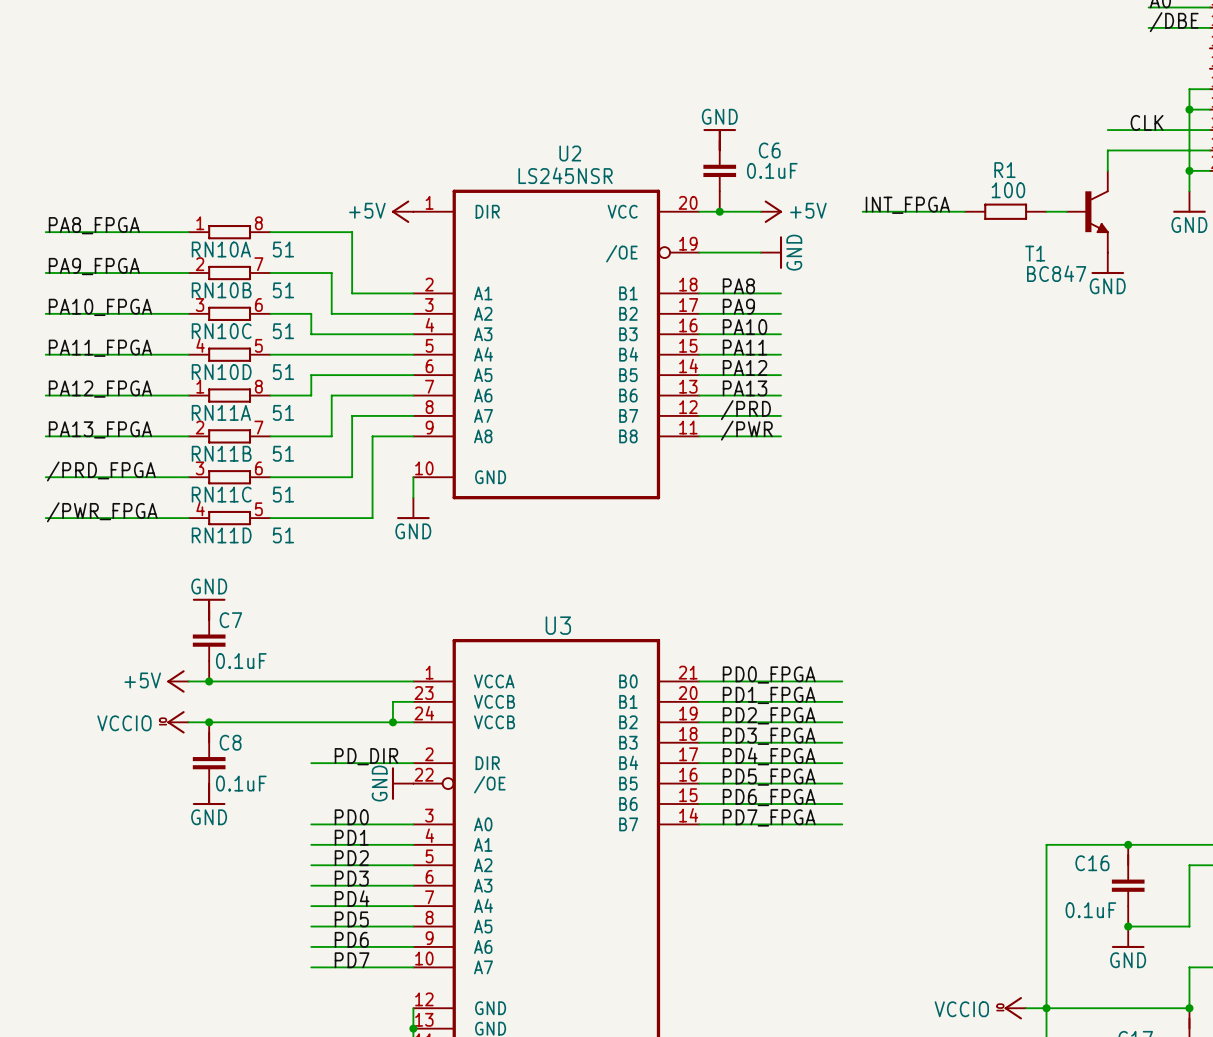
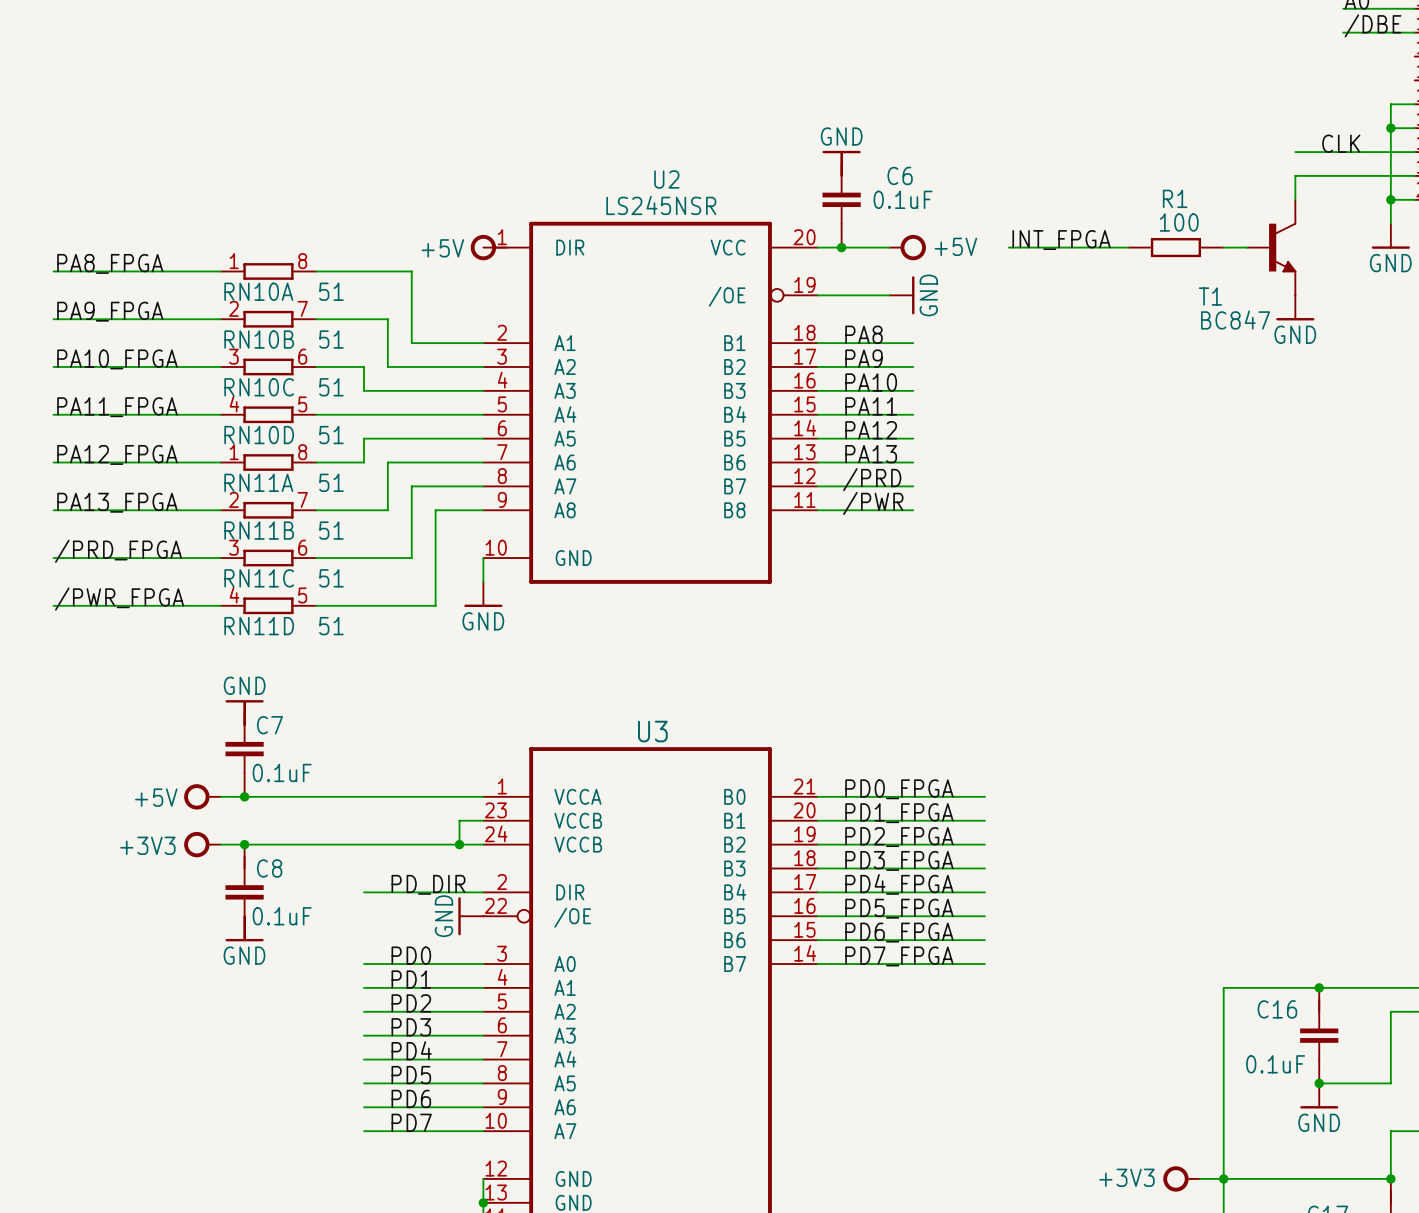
power symbol shape: [760, 200, 783, 223] -> [888, 234, 926, 261]
power symbol: +5V (402, 211) -> none
power symbol: none -> +5V (489, 247)
power symbol shape: [167, 670, 189, 693] -> [184, 784, 222, 810]
power symbol: VCCIO (178, 722) -> +3V3 (202, 844)
power symbol: VCCIO (1015, 1008) -> +3V3 (1181, 1178)

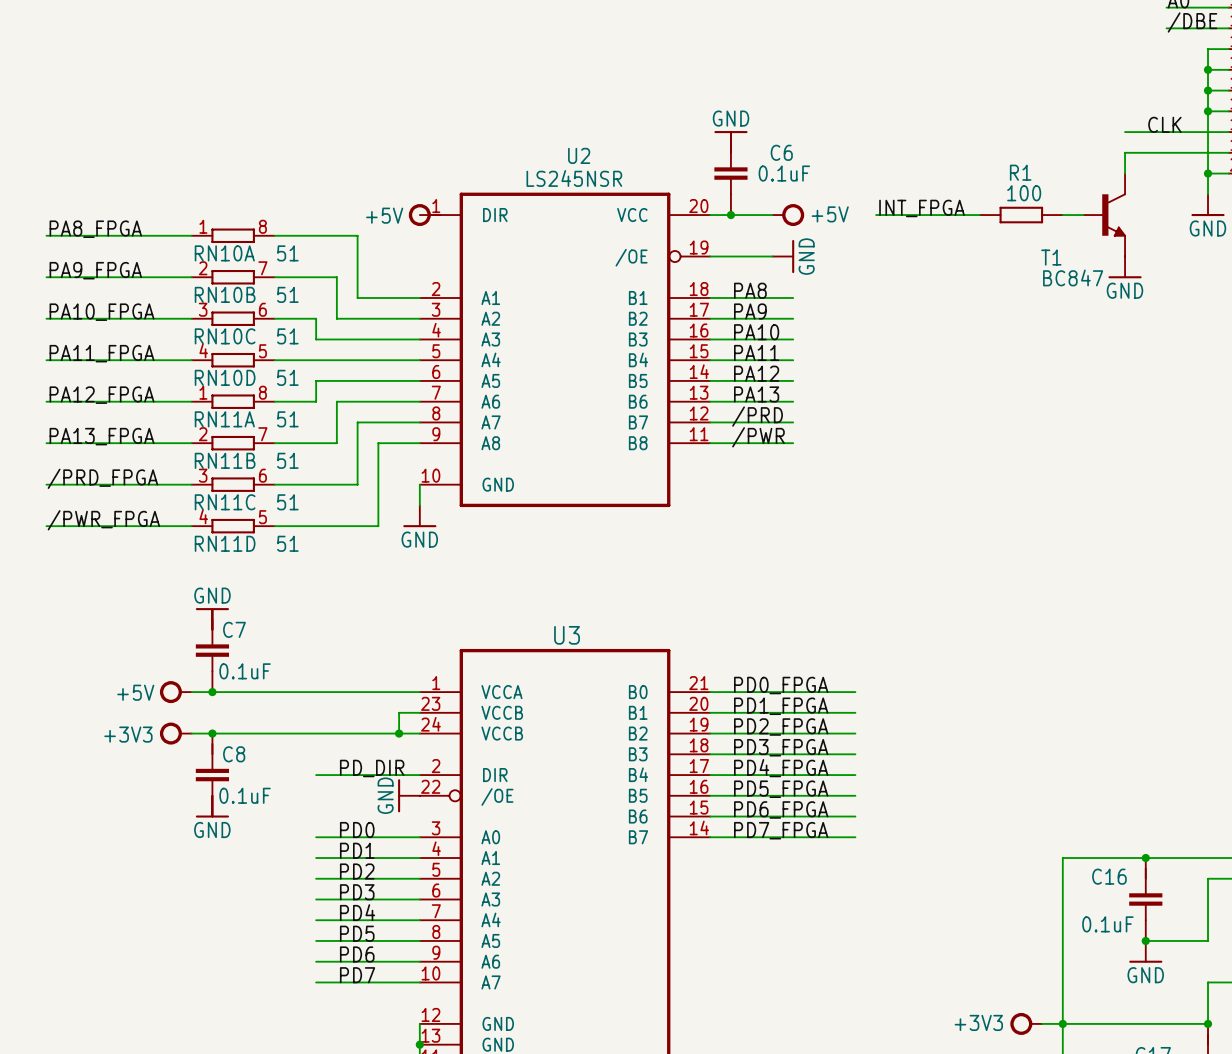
wire: none -> (1228, 49) (1208, 49) (1208, 90)
wire: none -> (1208, 69) (1228, 69)
junction: none -> (1208, 69)
junction: none -> (1208, 90)

